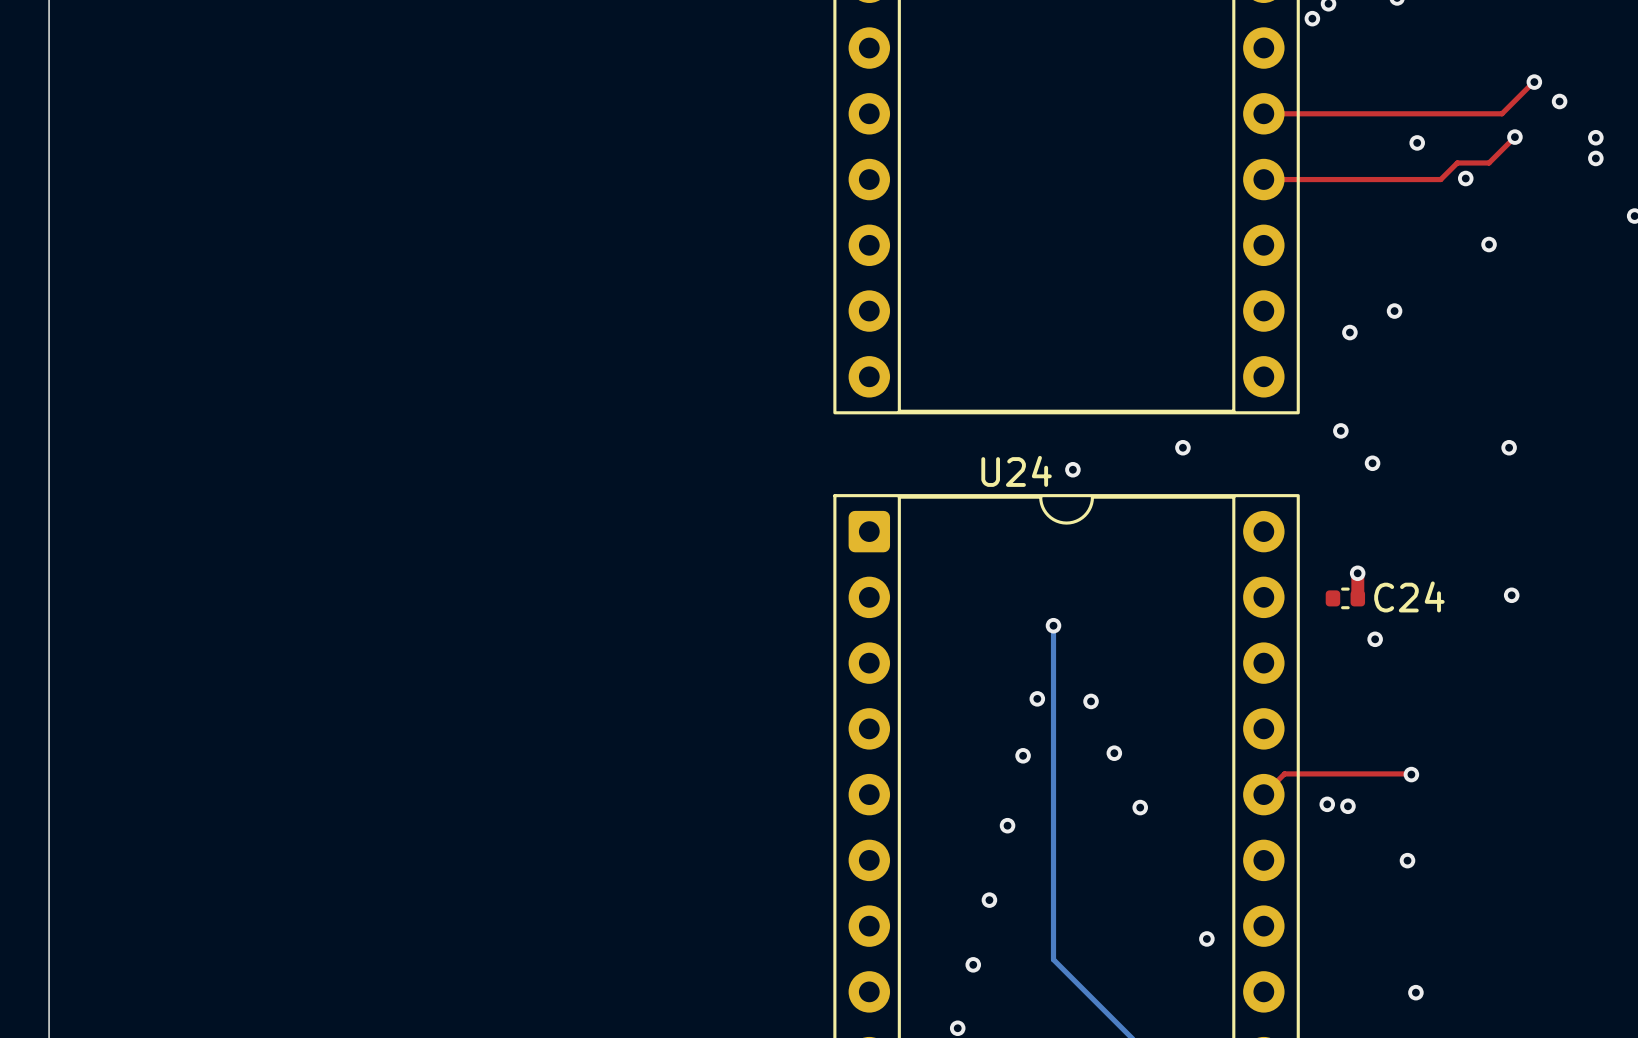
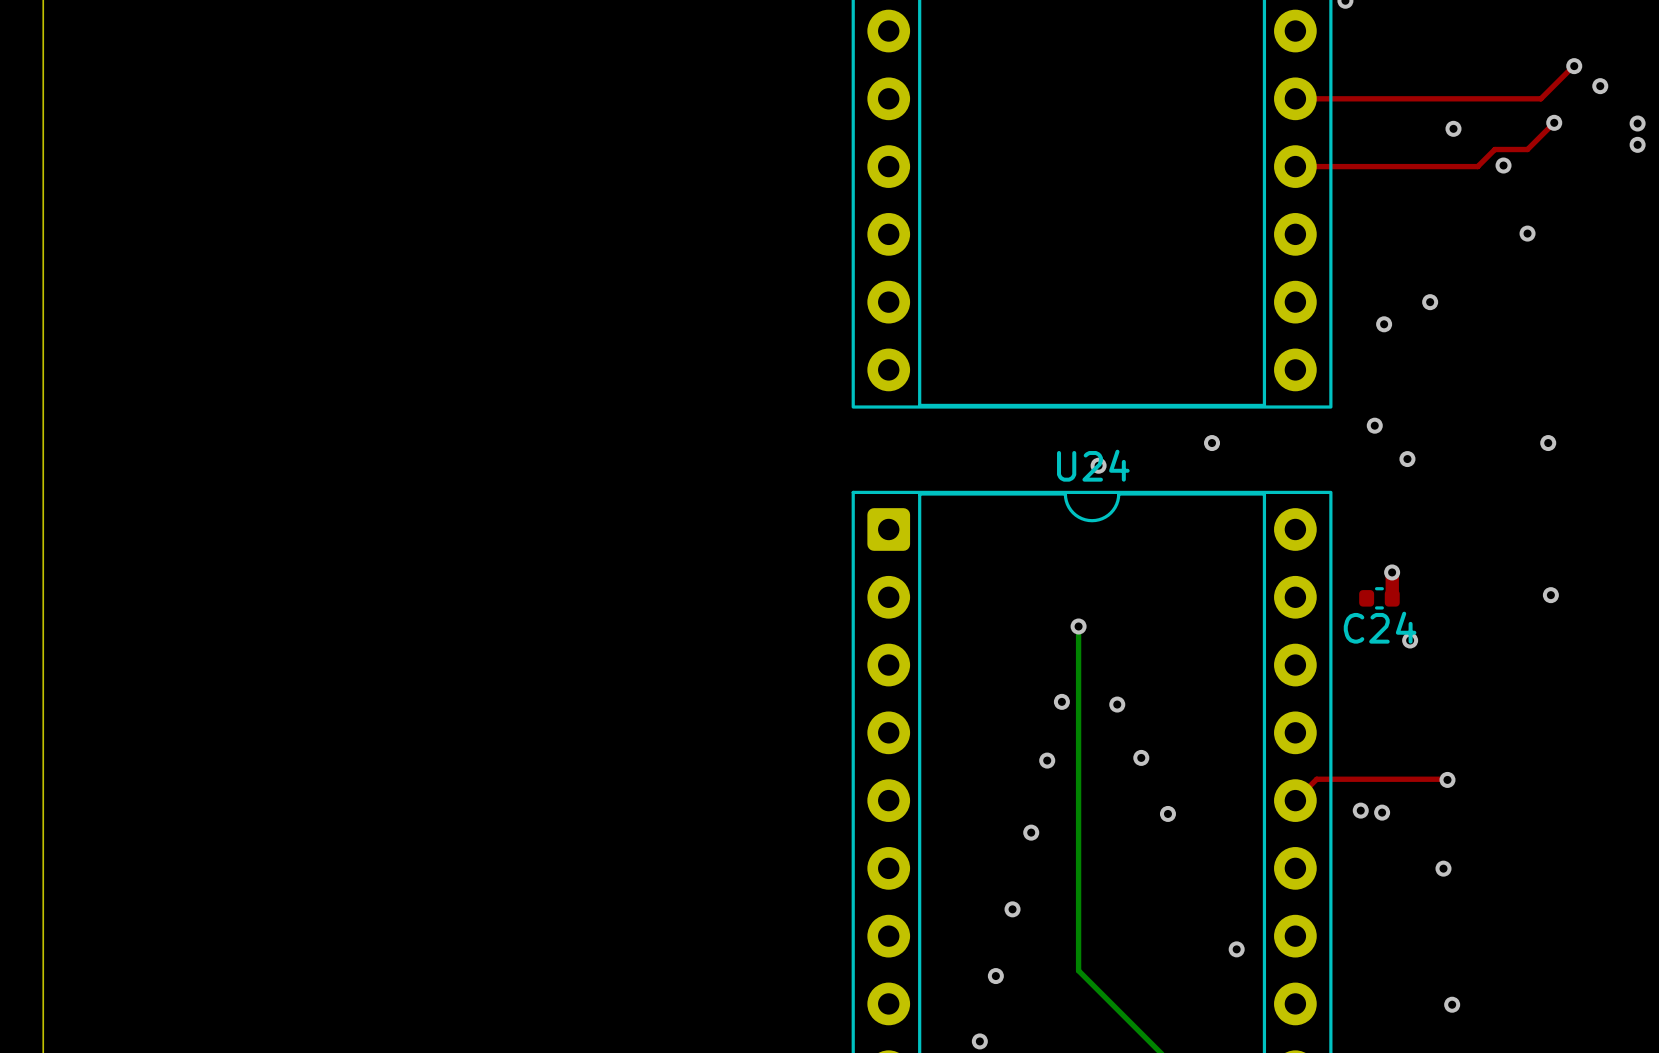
U24 name position: U24 (1016, 471) -> U24 (1093, 465)
C24 name position: C24 (1409, 596) -> C24 (1380, 627)

